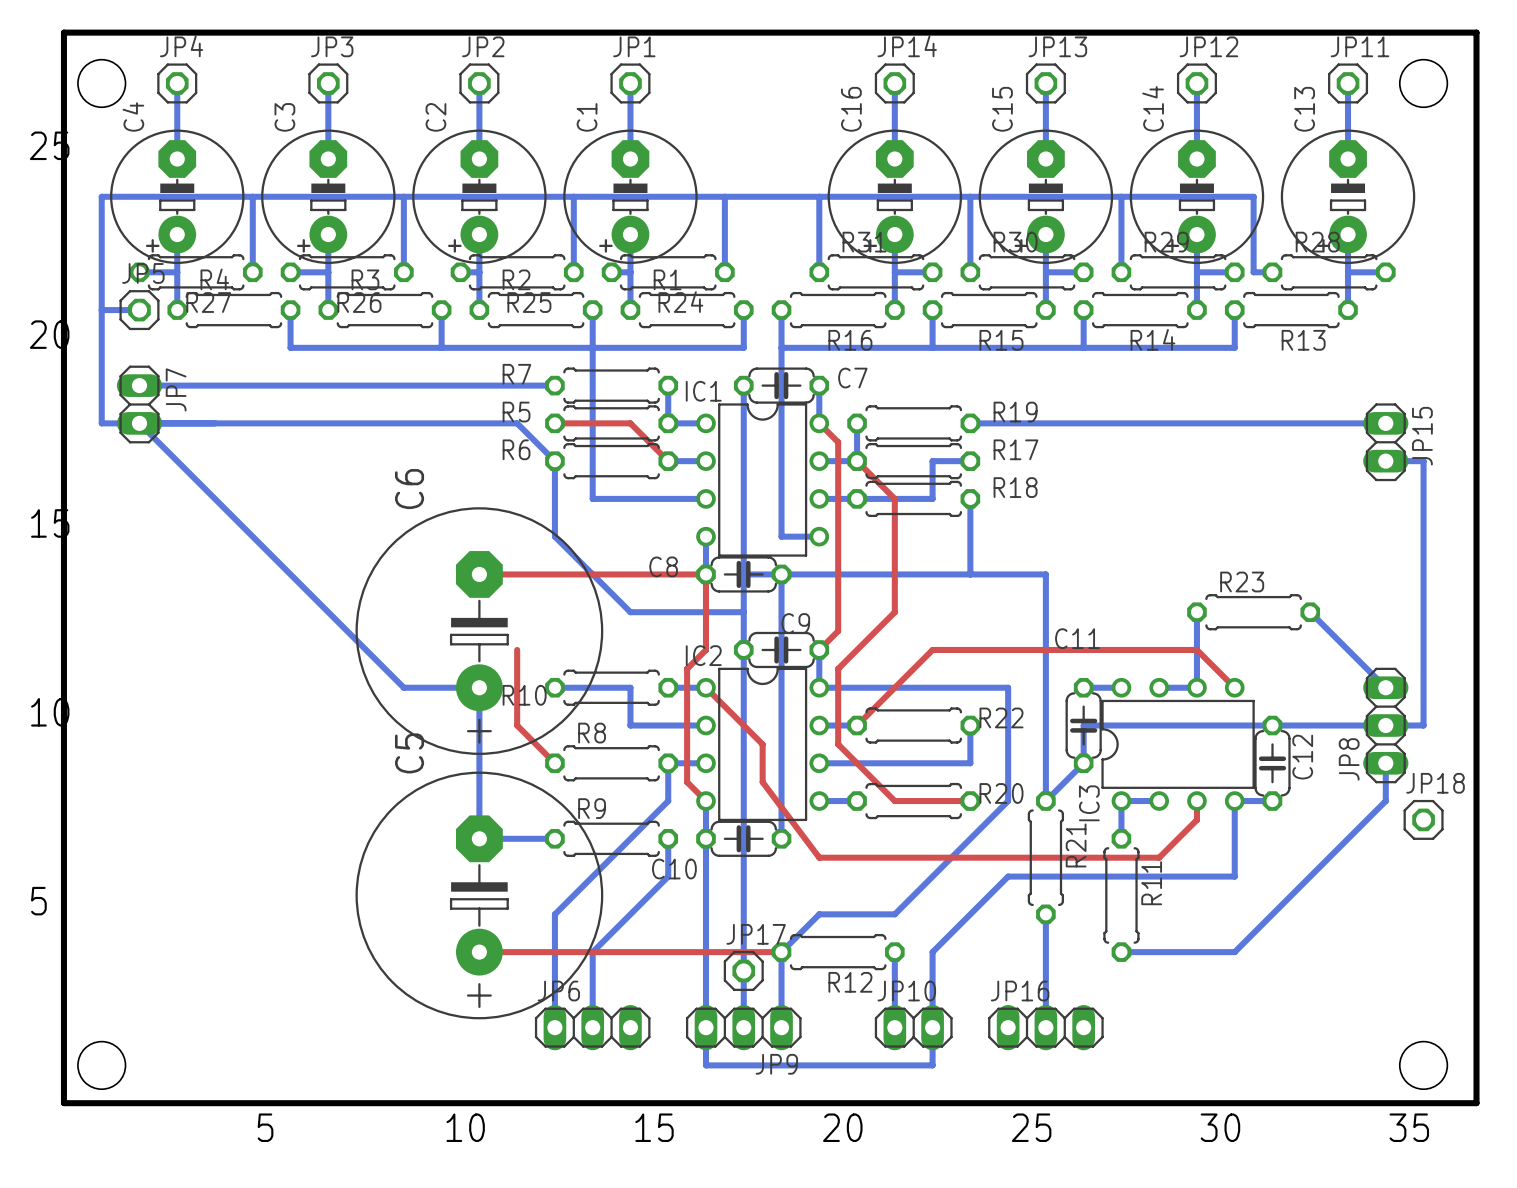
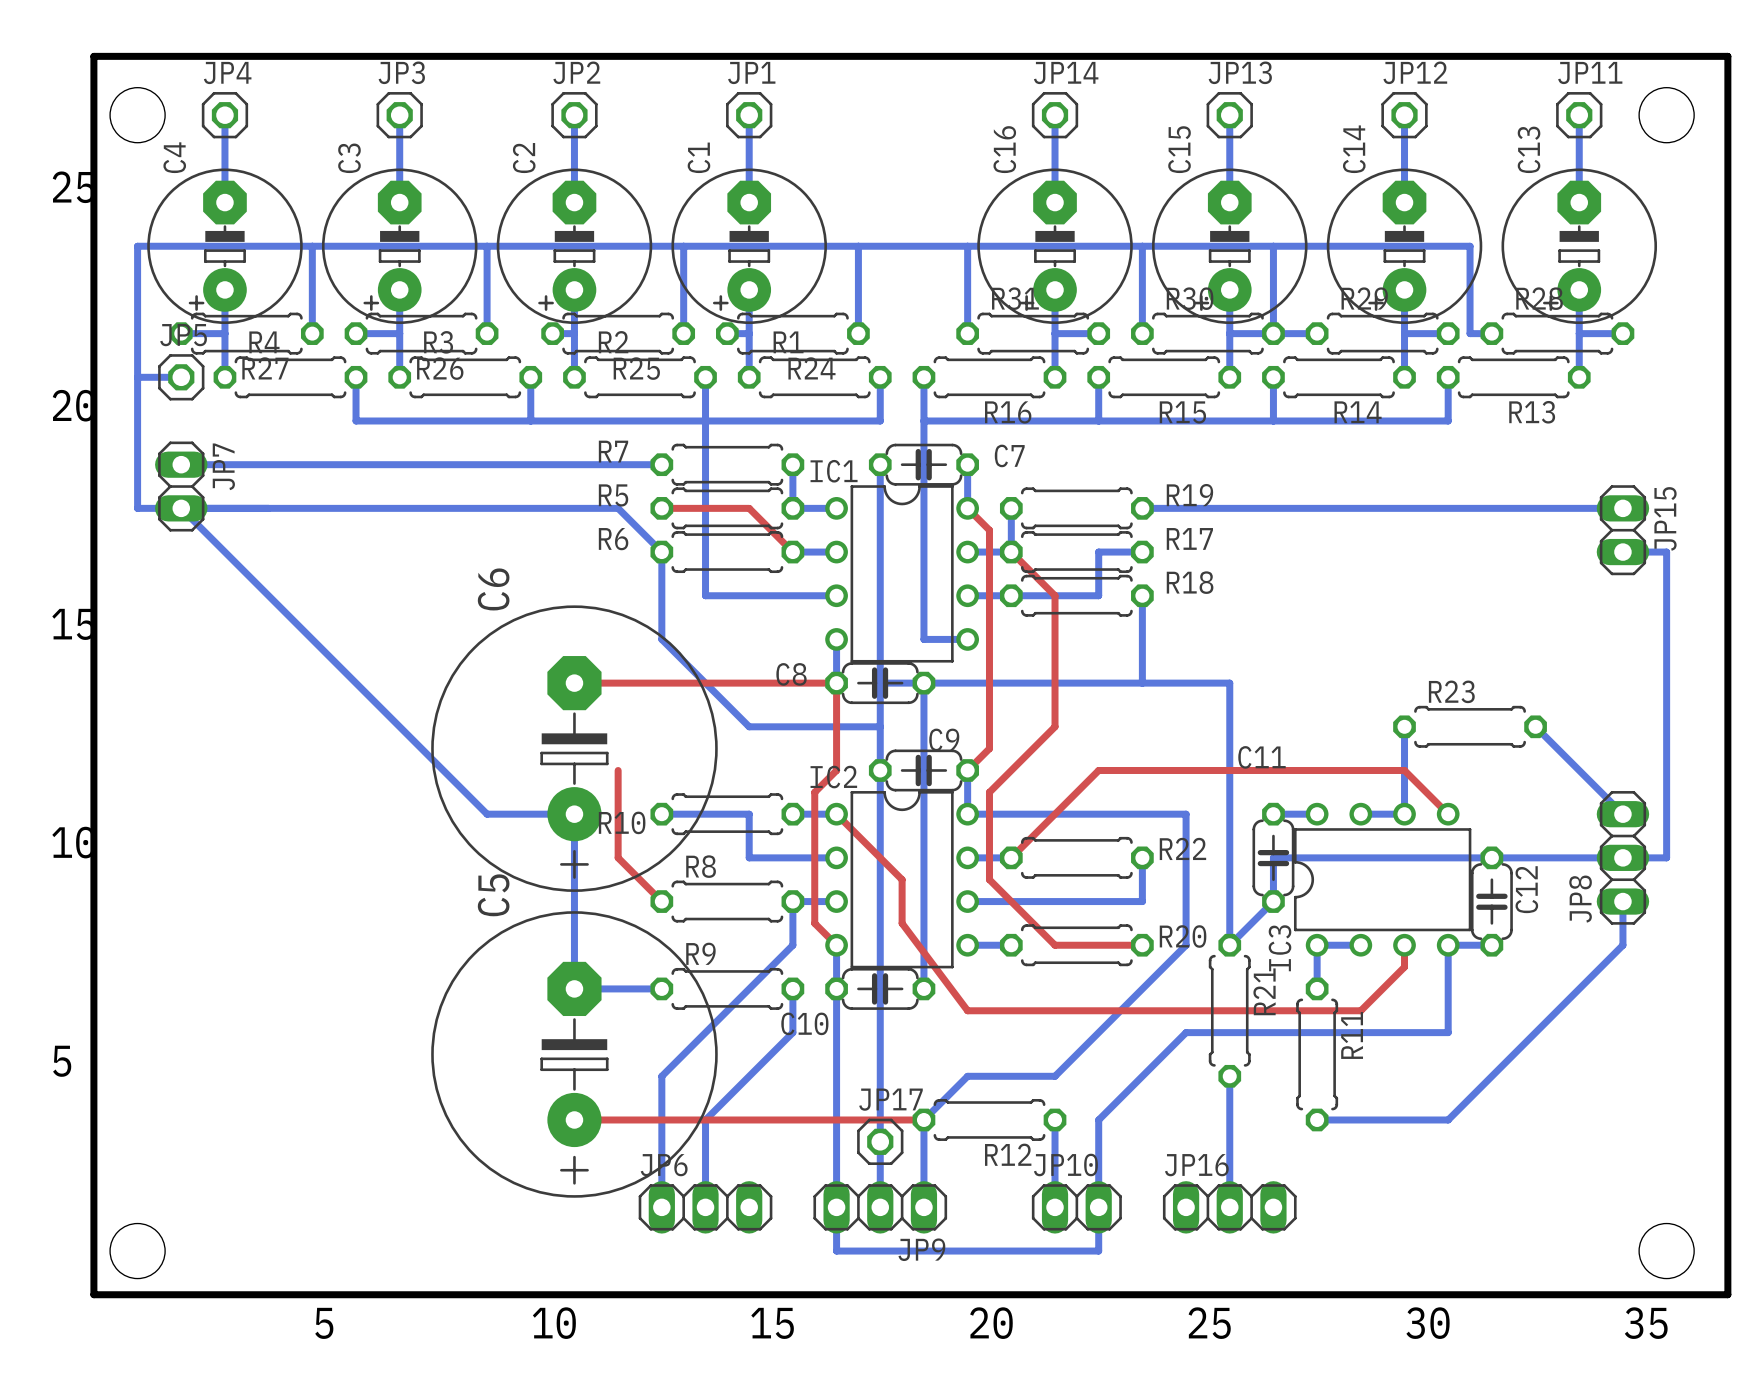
bottom track: (1121, 196) (1121, 272) -> (1273, 246) (1273, 333) (1317, 333)
JP18: (1423, 819) -> none

